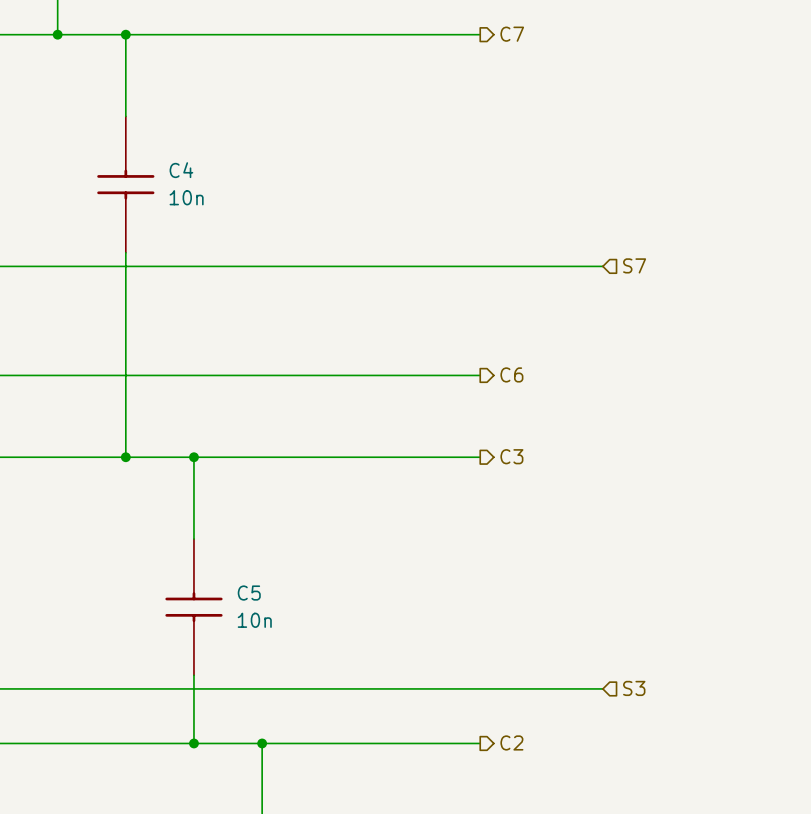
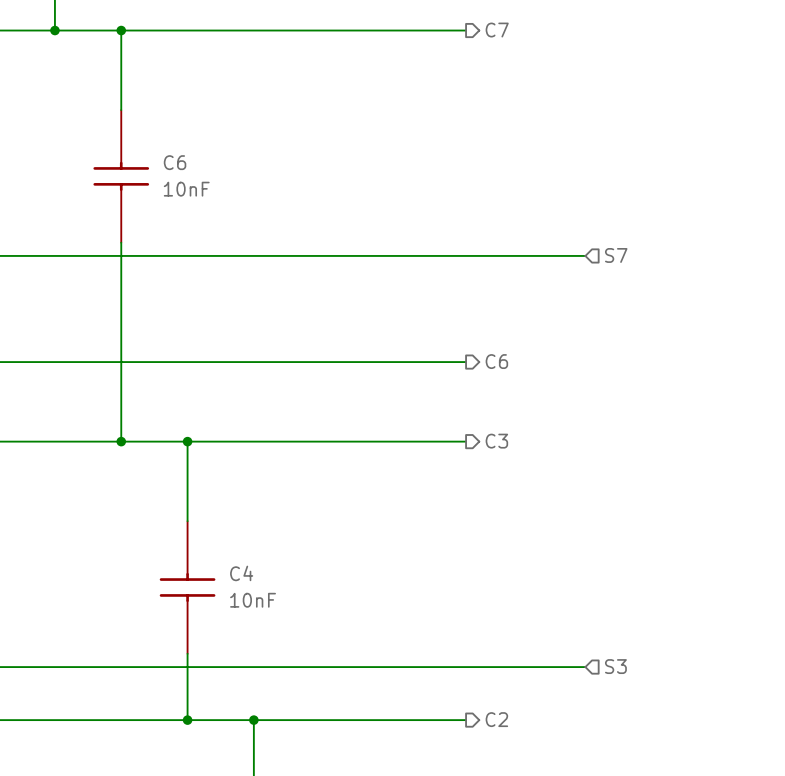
C4 name: C4 (181, 170) -> C6 (175, 162)
C4 value: 10n (186, 197) -> 10nF (186, 189)
C5 name: C5 (249, 593) -> C4 (241, 573)
C5 value: 10n (254, 620) -> 10nF (253, 600)

